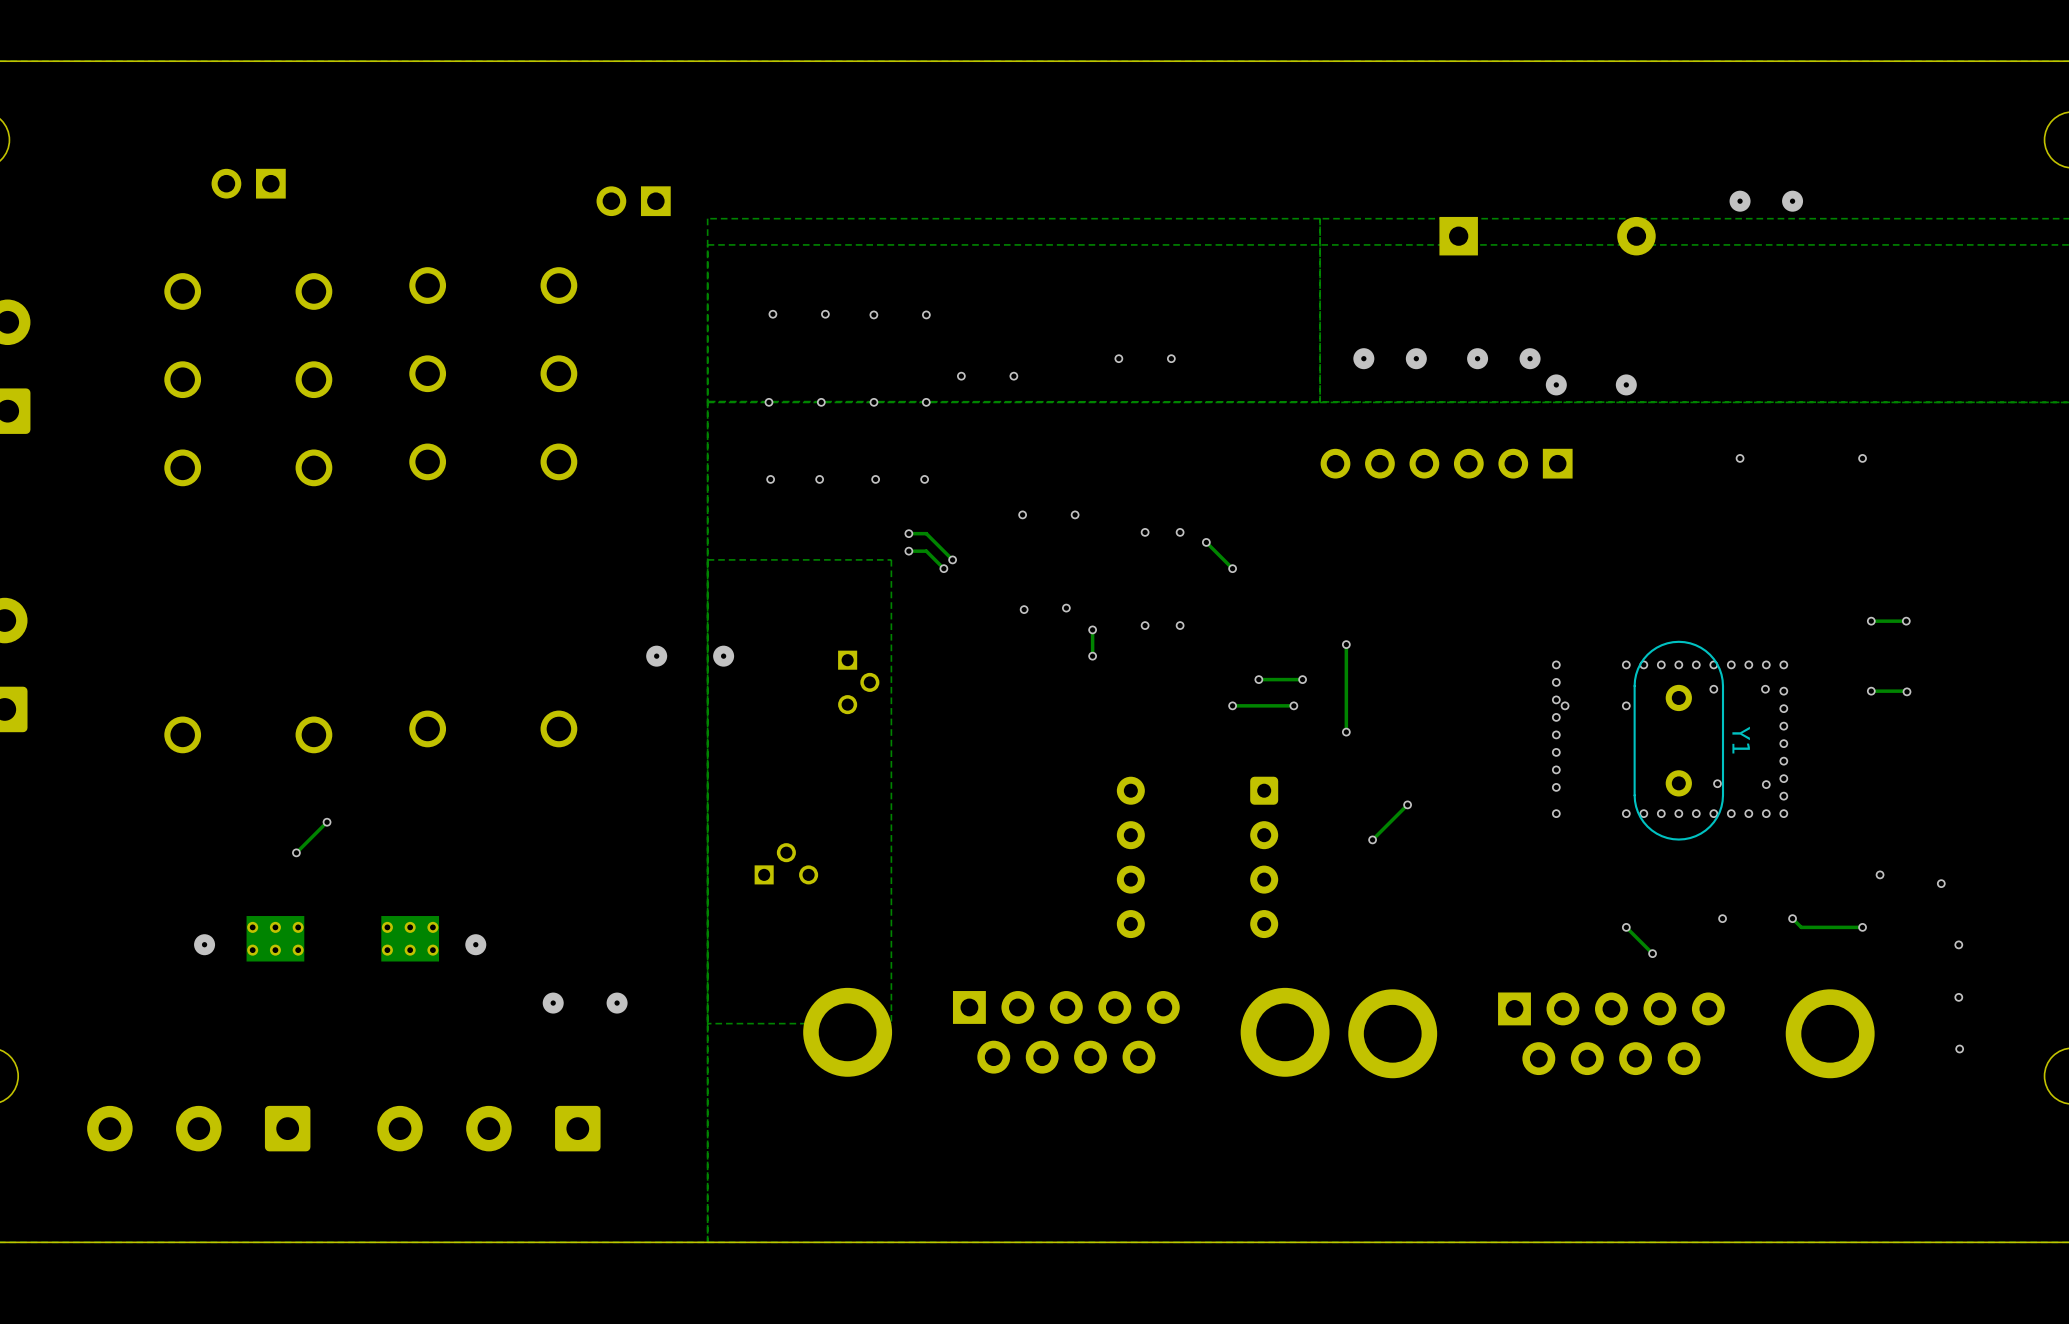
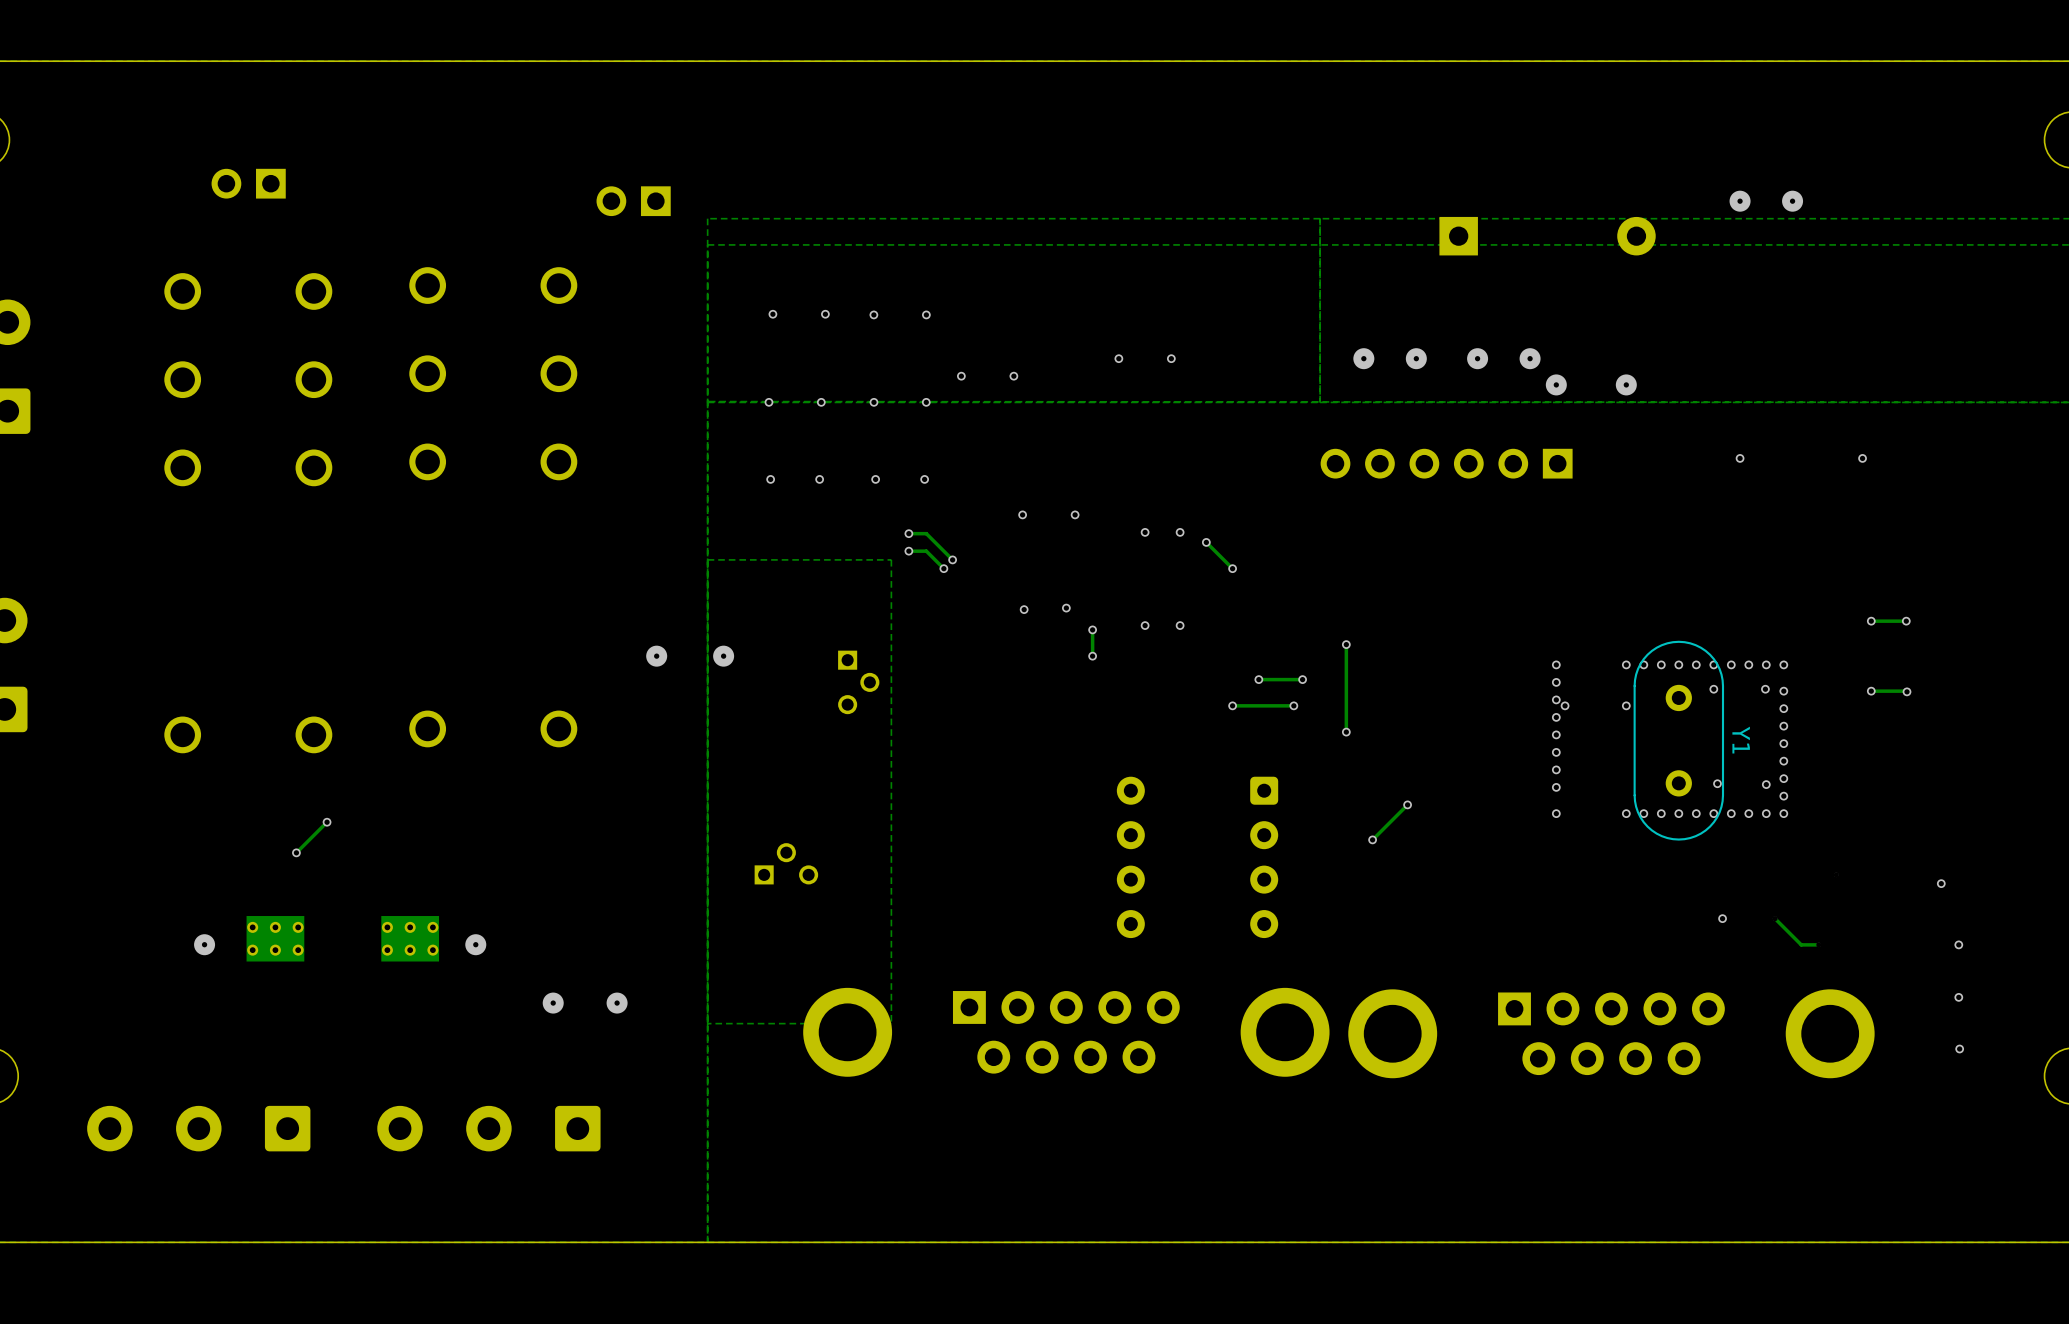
via: (1880, 874) -> none
track: none -> (1775, 918) (1801, 944) (1818, 944)
via: none -> (1775, 918)
track: (1792, 918) (1801, 927) (1862, 927) -> none
via: (1792, 918) -> none
track: (1626, 927) (1652, 953) -> none
via: (1626, 927) -> none
via: (1862, 927) -> none
via: none -> (1818, 944)
via: (1652, 953) -> none

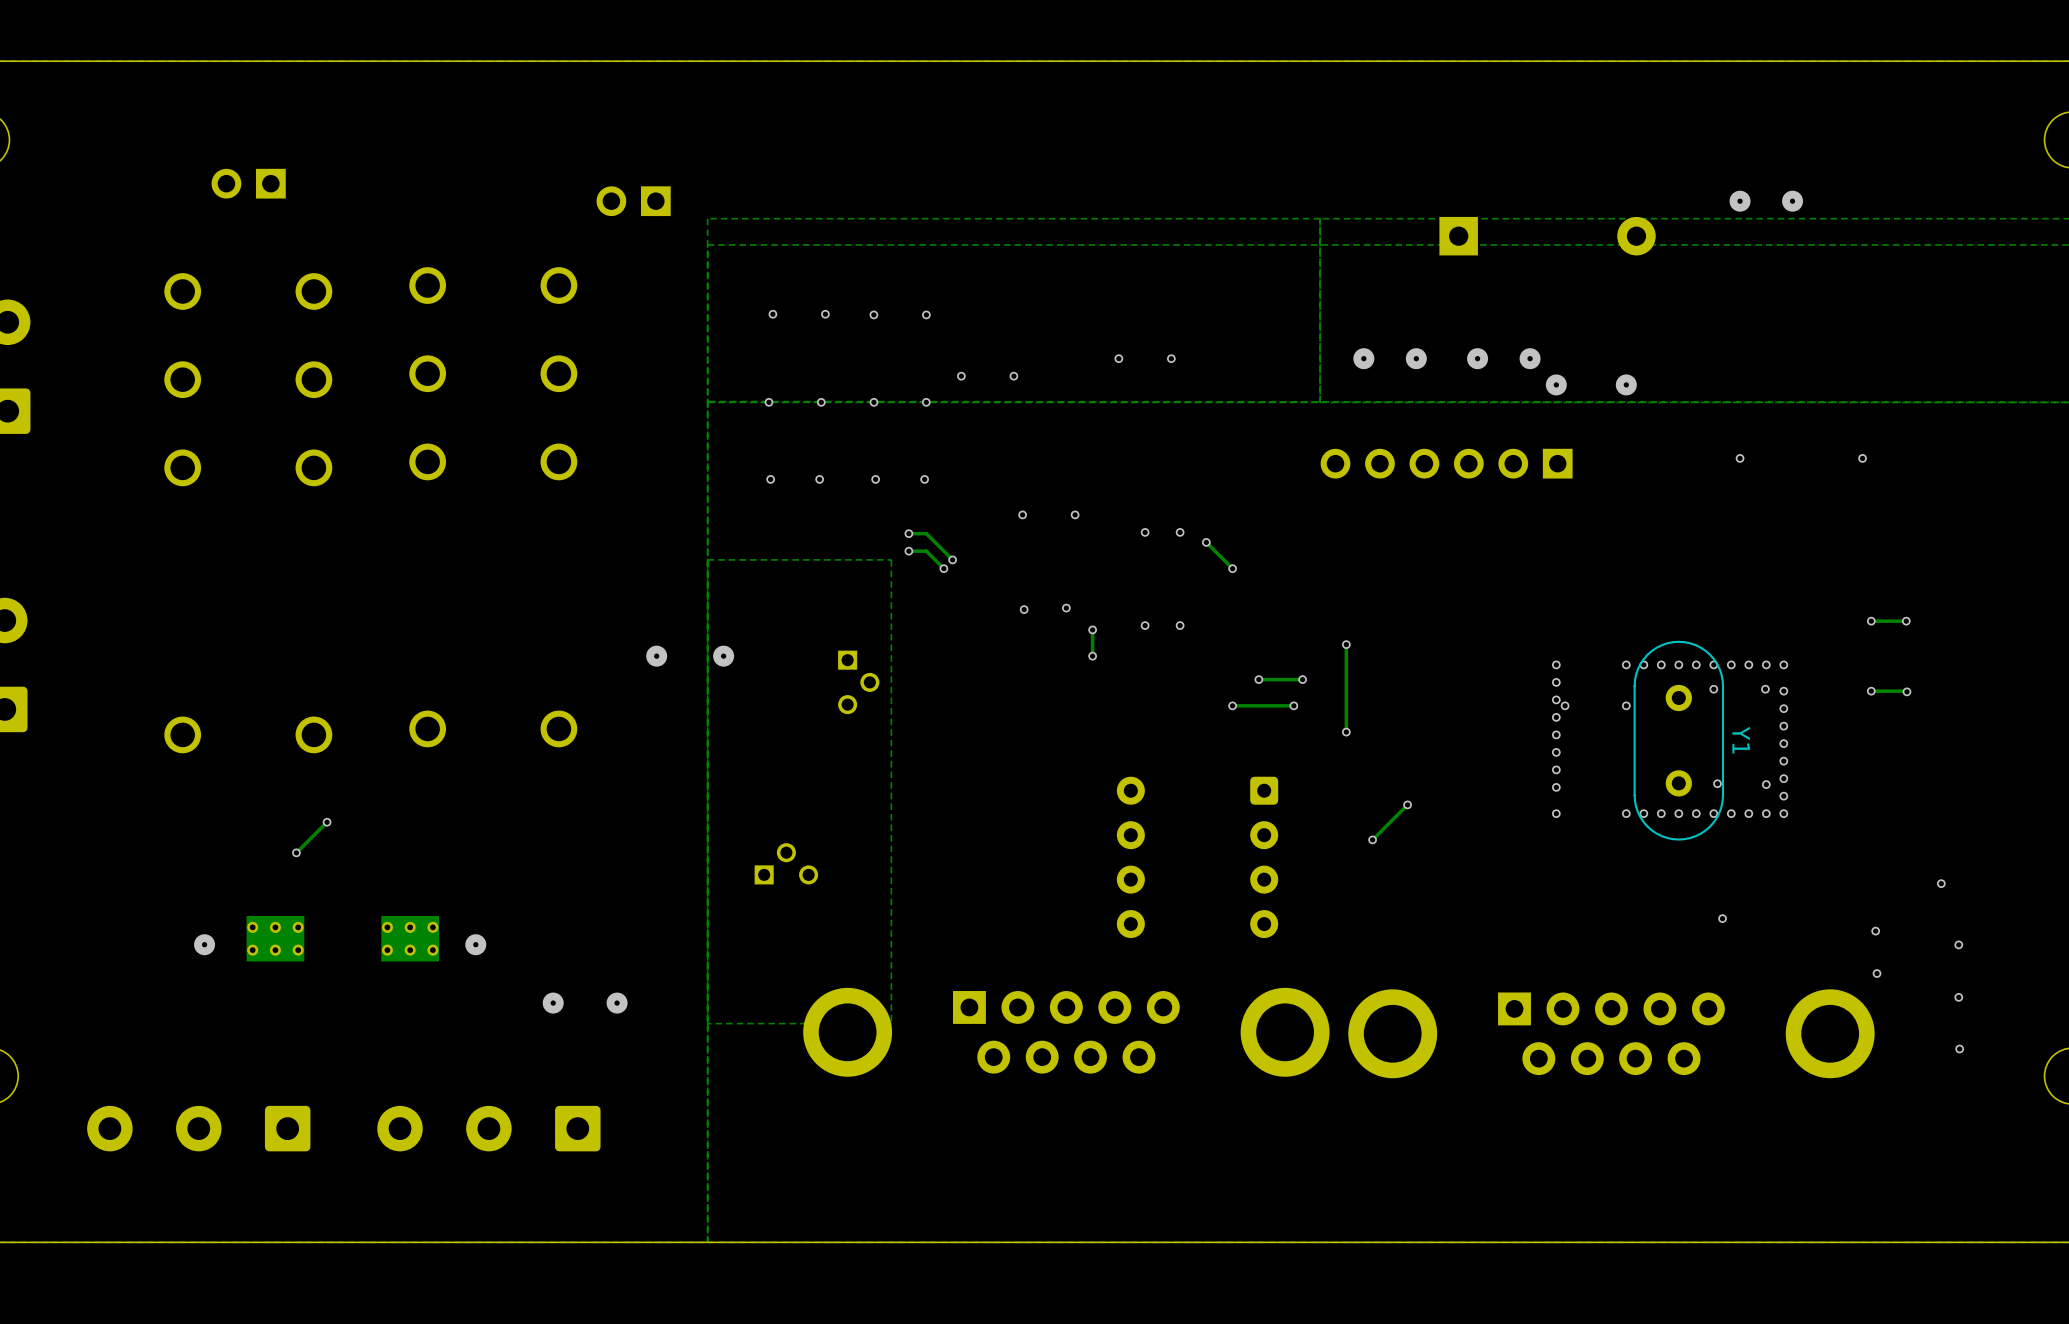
track: (1775, 918) (1801, 944) (1818, 944) -> none
via: (1775, 918) -> none
via: none -> (1875, 931)
via: (1818, 944) -> none
via: none -> (1876, 973)

